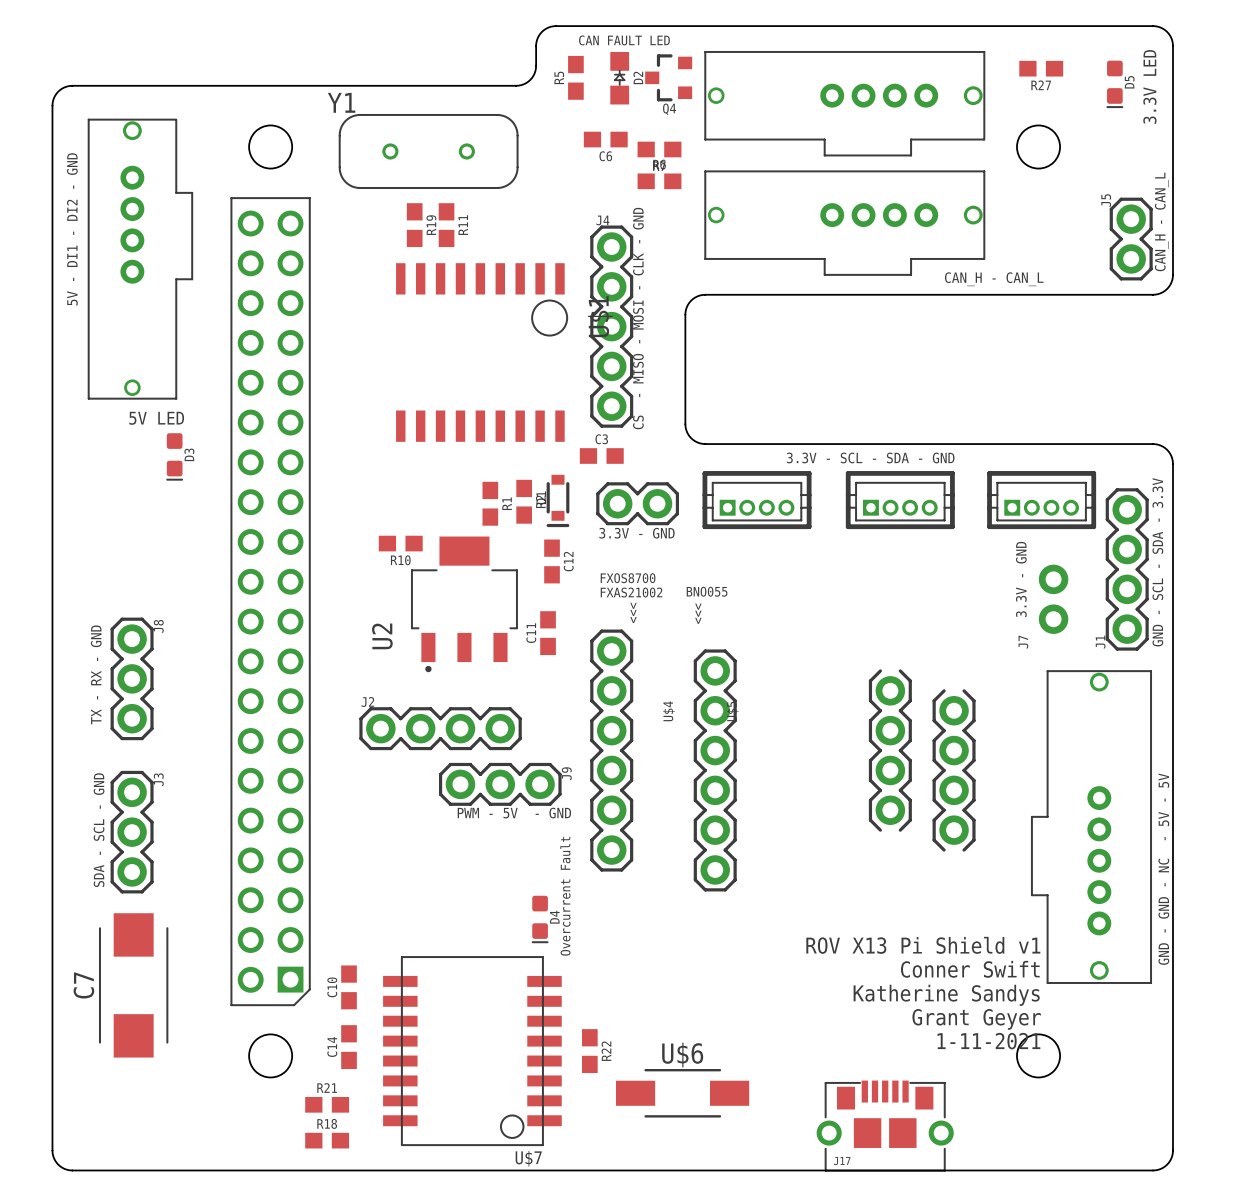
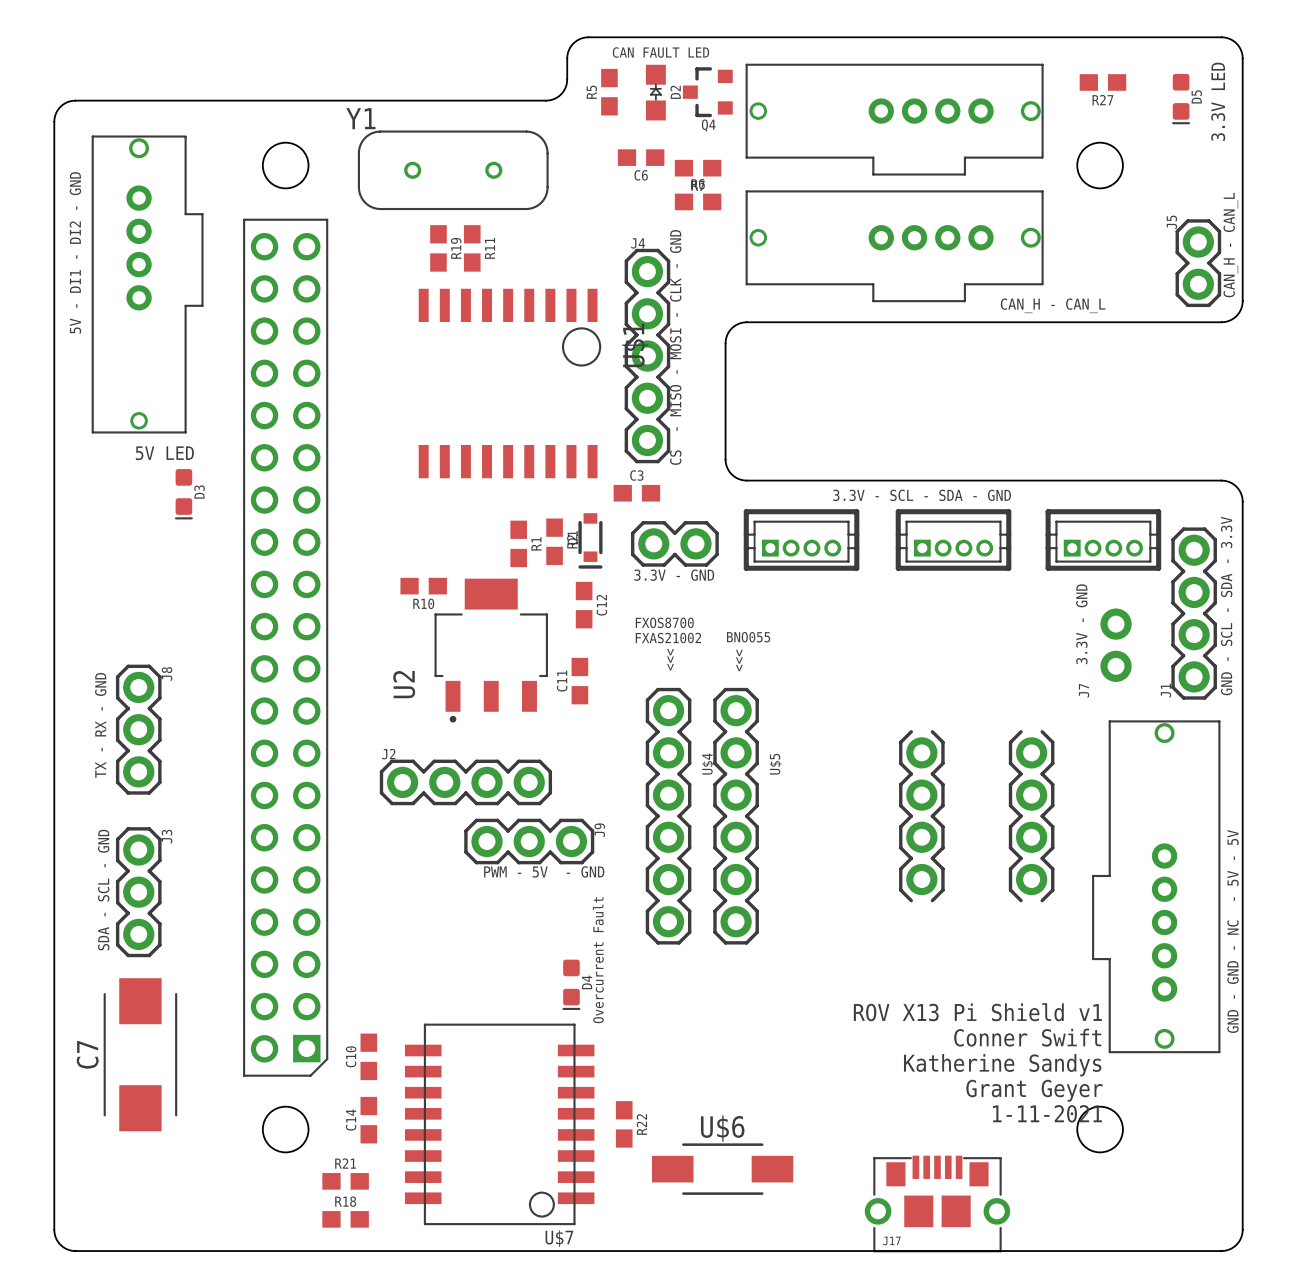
U$4 footprint: [590, 629, 912, 872] -> [645, 687, 945, 945]
U$5 footprint: [693, 649, 976, 892] -> [713, 687, 1055, 945]

